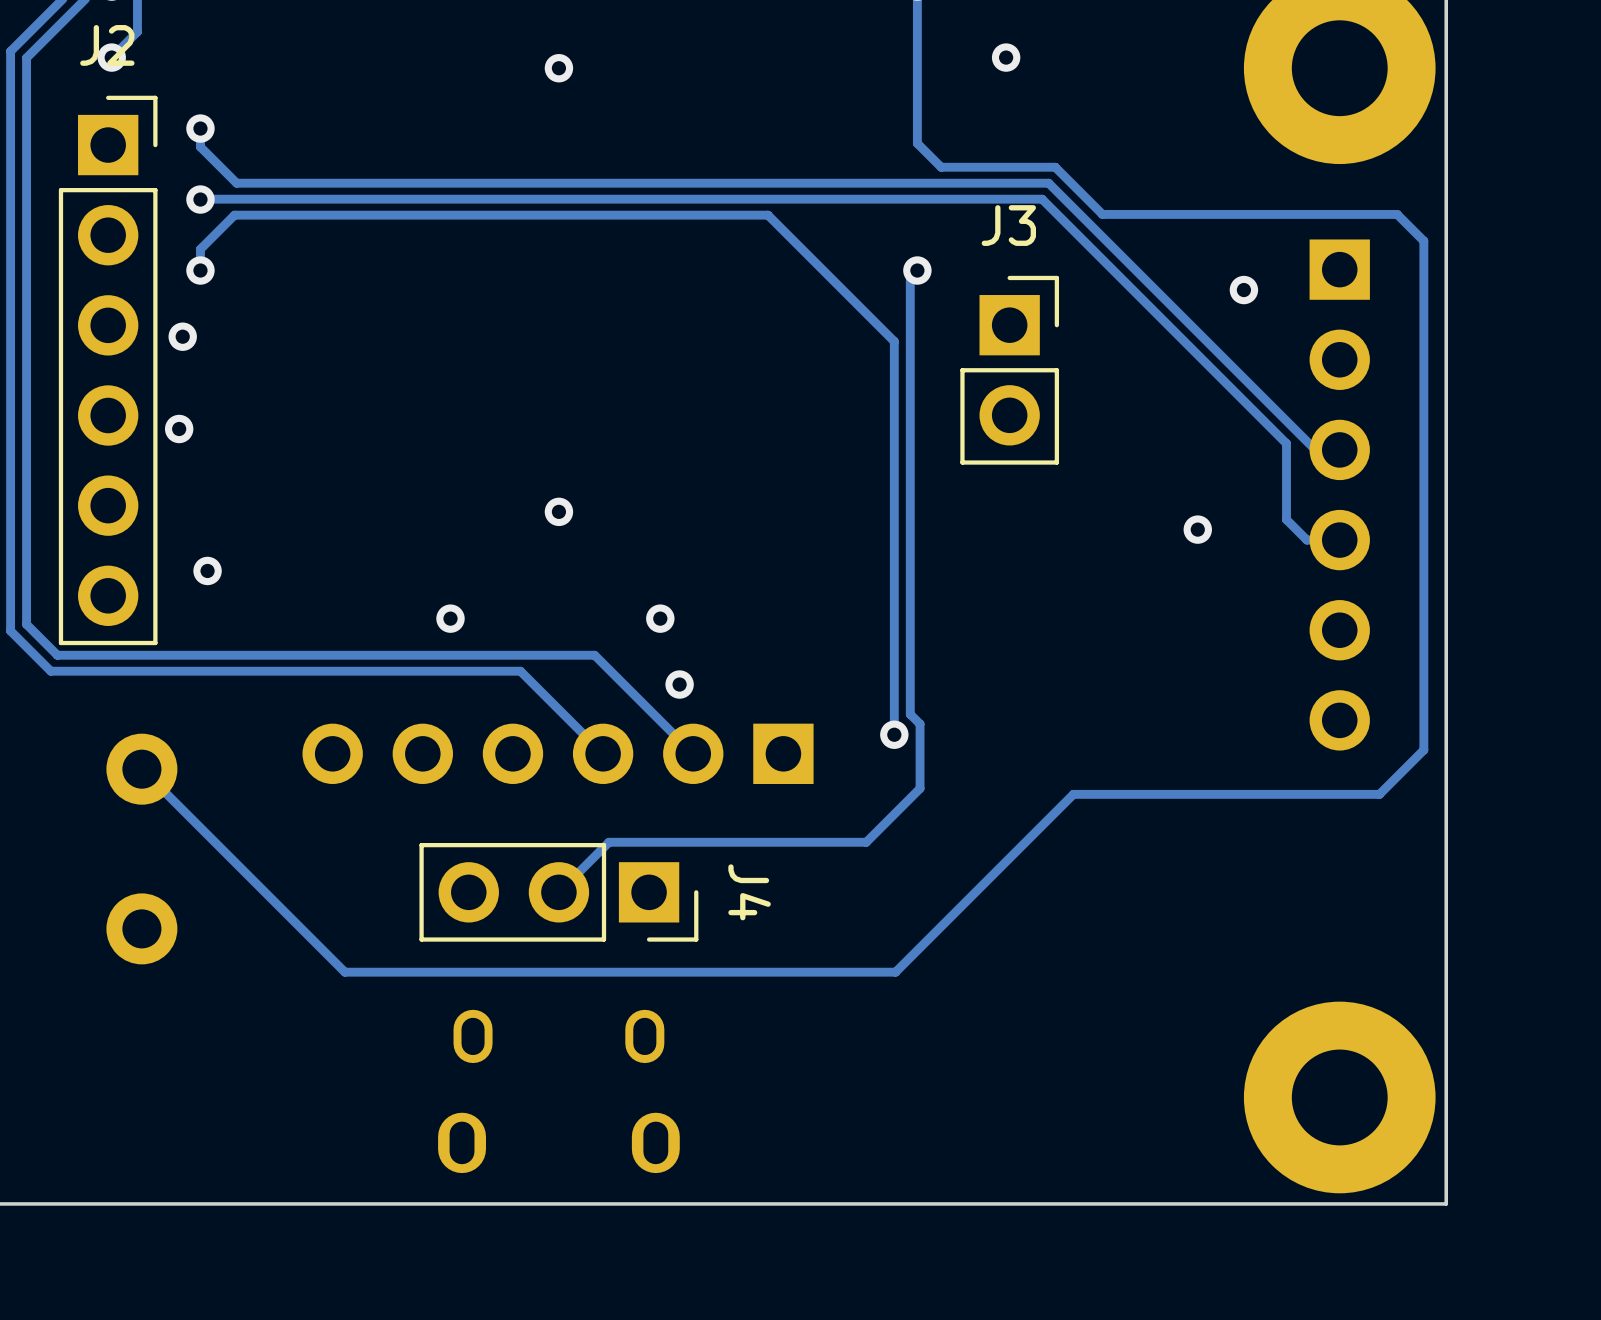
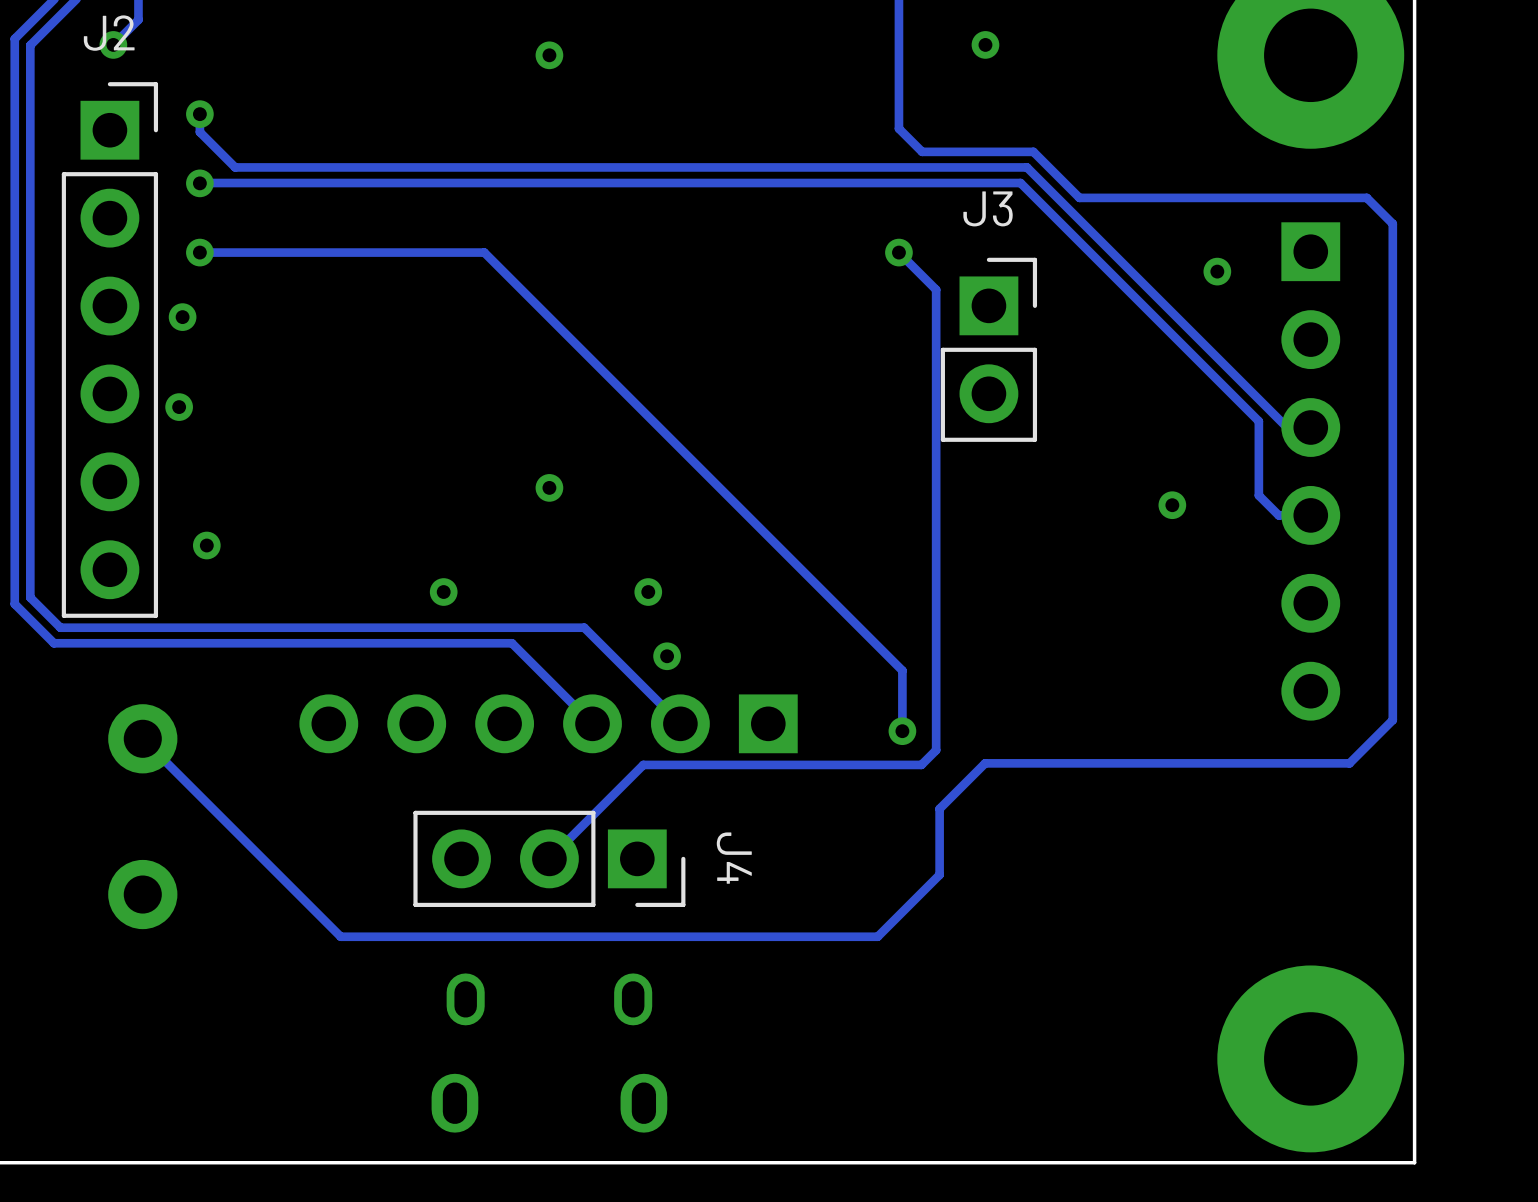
track: (200, 270) (200, 249) (234, 215) (767, 215) (894, 341) (894, 734) -> (199, 252) (484, 252) (902, 670) (902, 731)
track: (917, 270) (910, 277) (910, 714) (920, 724) (920, 788) (866, 842) (608, 842) -> (898, 252) (936, 289) (936, 750) (921, 764) (643, 764) (598, 810)
via position: (894, 734) -> (902, 731)
track: (1073, 794) (959, 908) -> (1051, 763) (985, 763) (939, 808) (939, 874)

